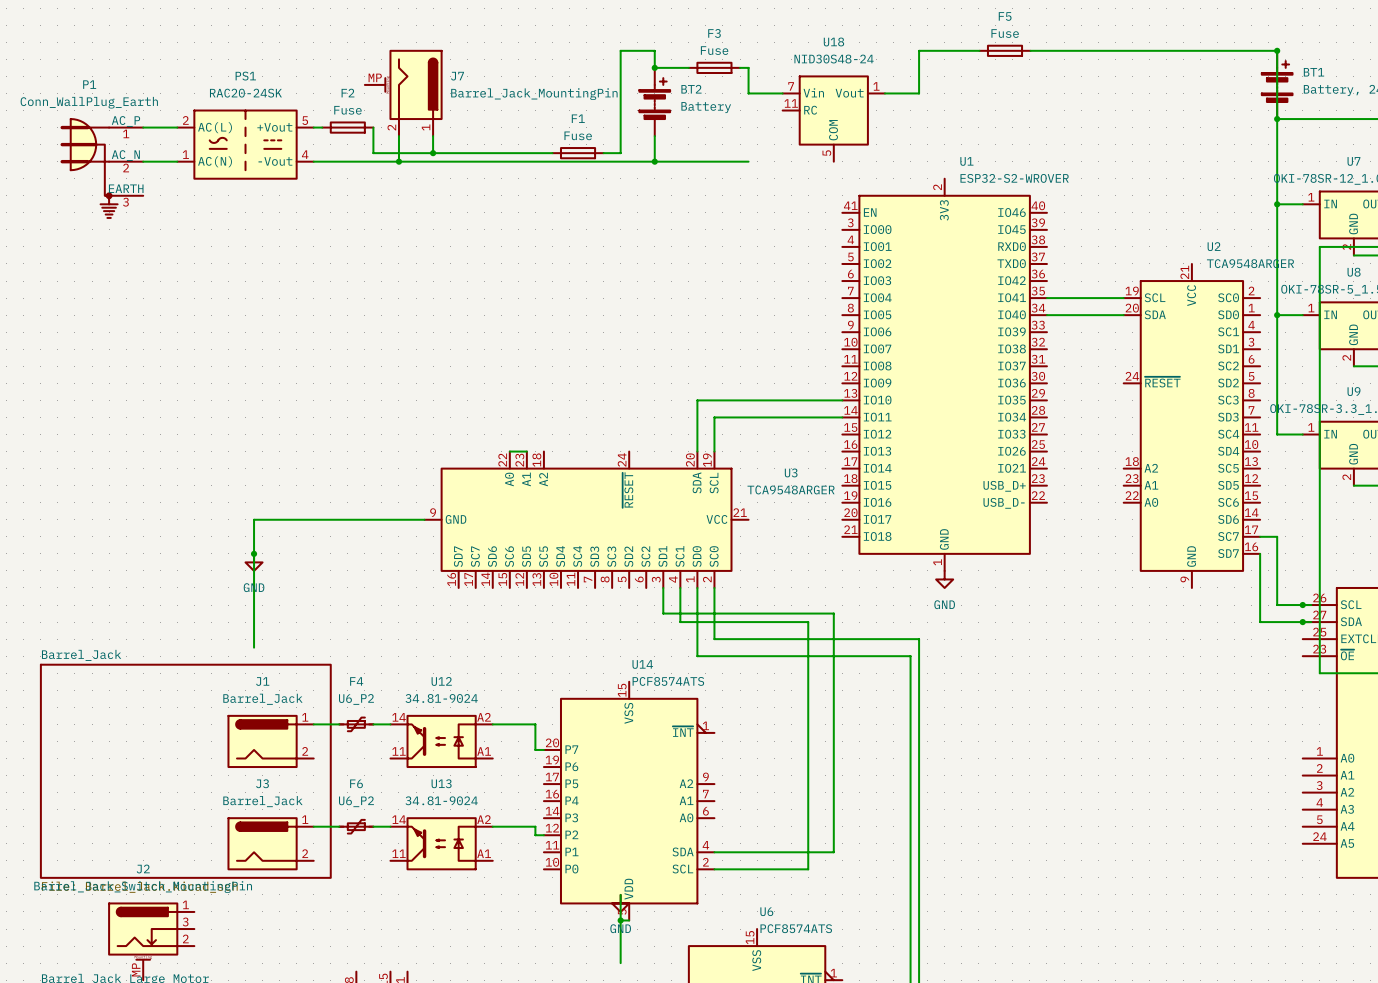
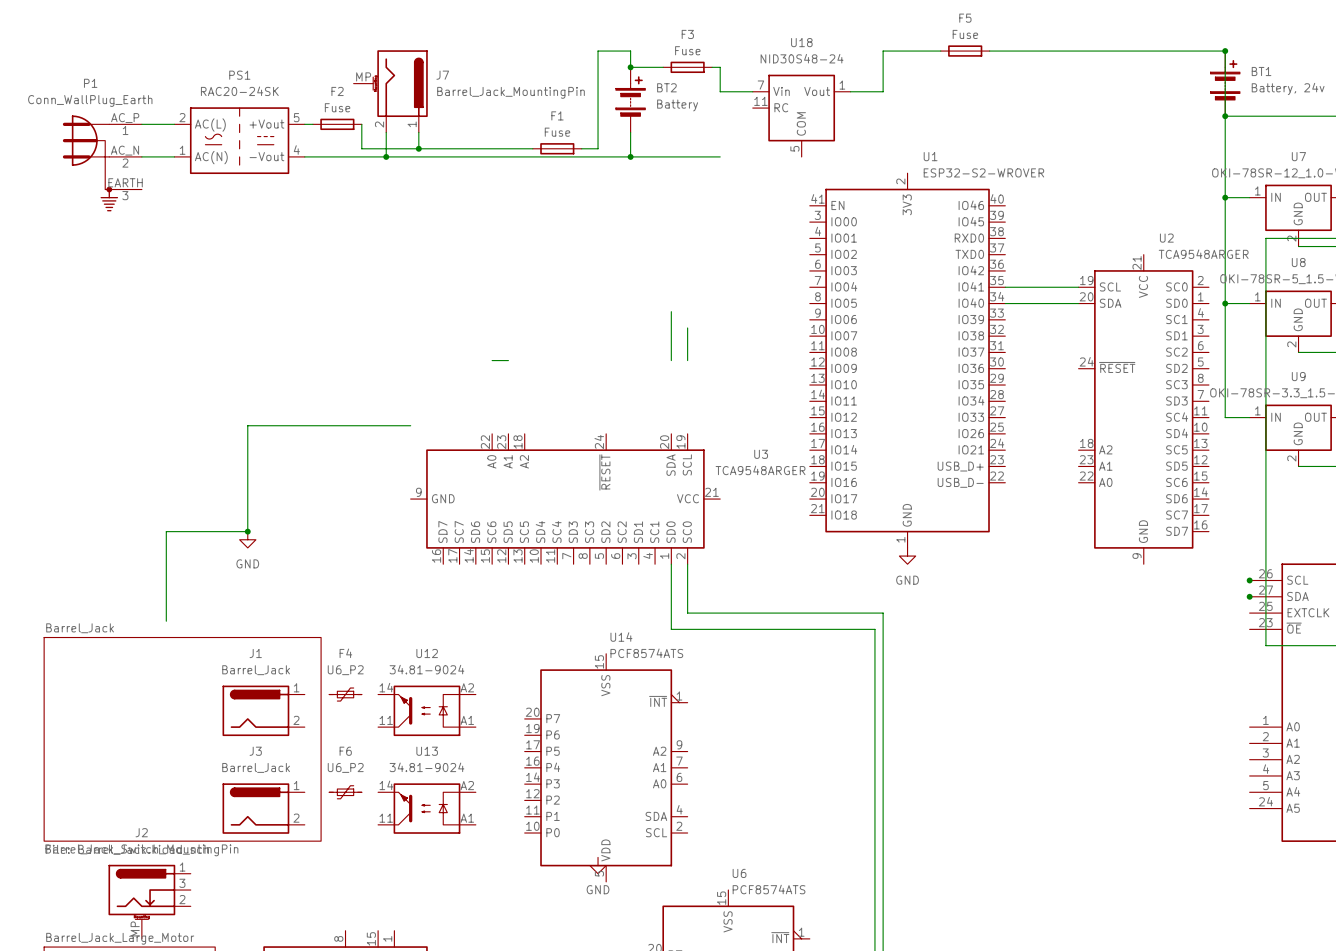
wire: none -> (671, 311) (671, 360)
wire: none -> (687, 327) (687, 360)
wire: (842, 400) (697, 400) (697, 451) -> none
wire: (842, 417) (714, 417) (714, 451) -> none
wire: (509, 451) (526, 451) -> (492, 360) (508, 360)
wire: (254, 519) (424, 519) -> (247, 499) (247, 425) (410, 425)
wire: (1260, 536) (1277, 536) (1277, 605) (1311, 605) -> none
wire: (254, 553) (254, 647) -> (247, 531) (166, 531) (166, 621)
wire: (1260, 553) (1260, 622) (1311, 622) -> none
wire: (663, 587) (663, 613) (833, 613) (833, 852) (714, 852) -> none
wire: (680, 587) (680, 622) (808, 622) (808, 869) (714, 869) -> none
wire: (313, 724) (339, 724) -> none
wire: (373, 724) (390, 724) -> none
wire: (492, 724) (535, 724) (535, 749) (543, 749) -> none
wire: (313, 826) (339, 826) -> none
wire: (373, 826) (390, 826) -> none
wire: (492, 826) (535, 826) (535, 835) (543, 835) -> none
wire: (620, 894) (620, 963) -> none
wire: (620, 920) (629, 920) -> none
junction: (620, 920) -> none

